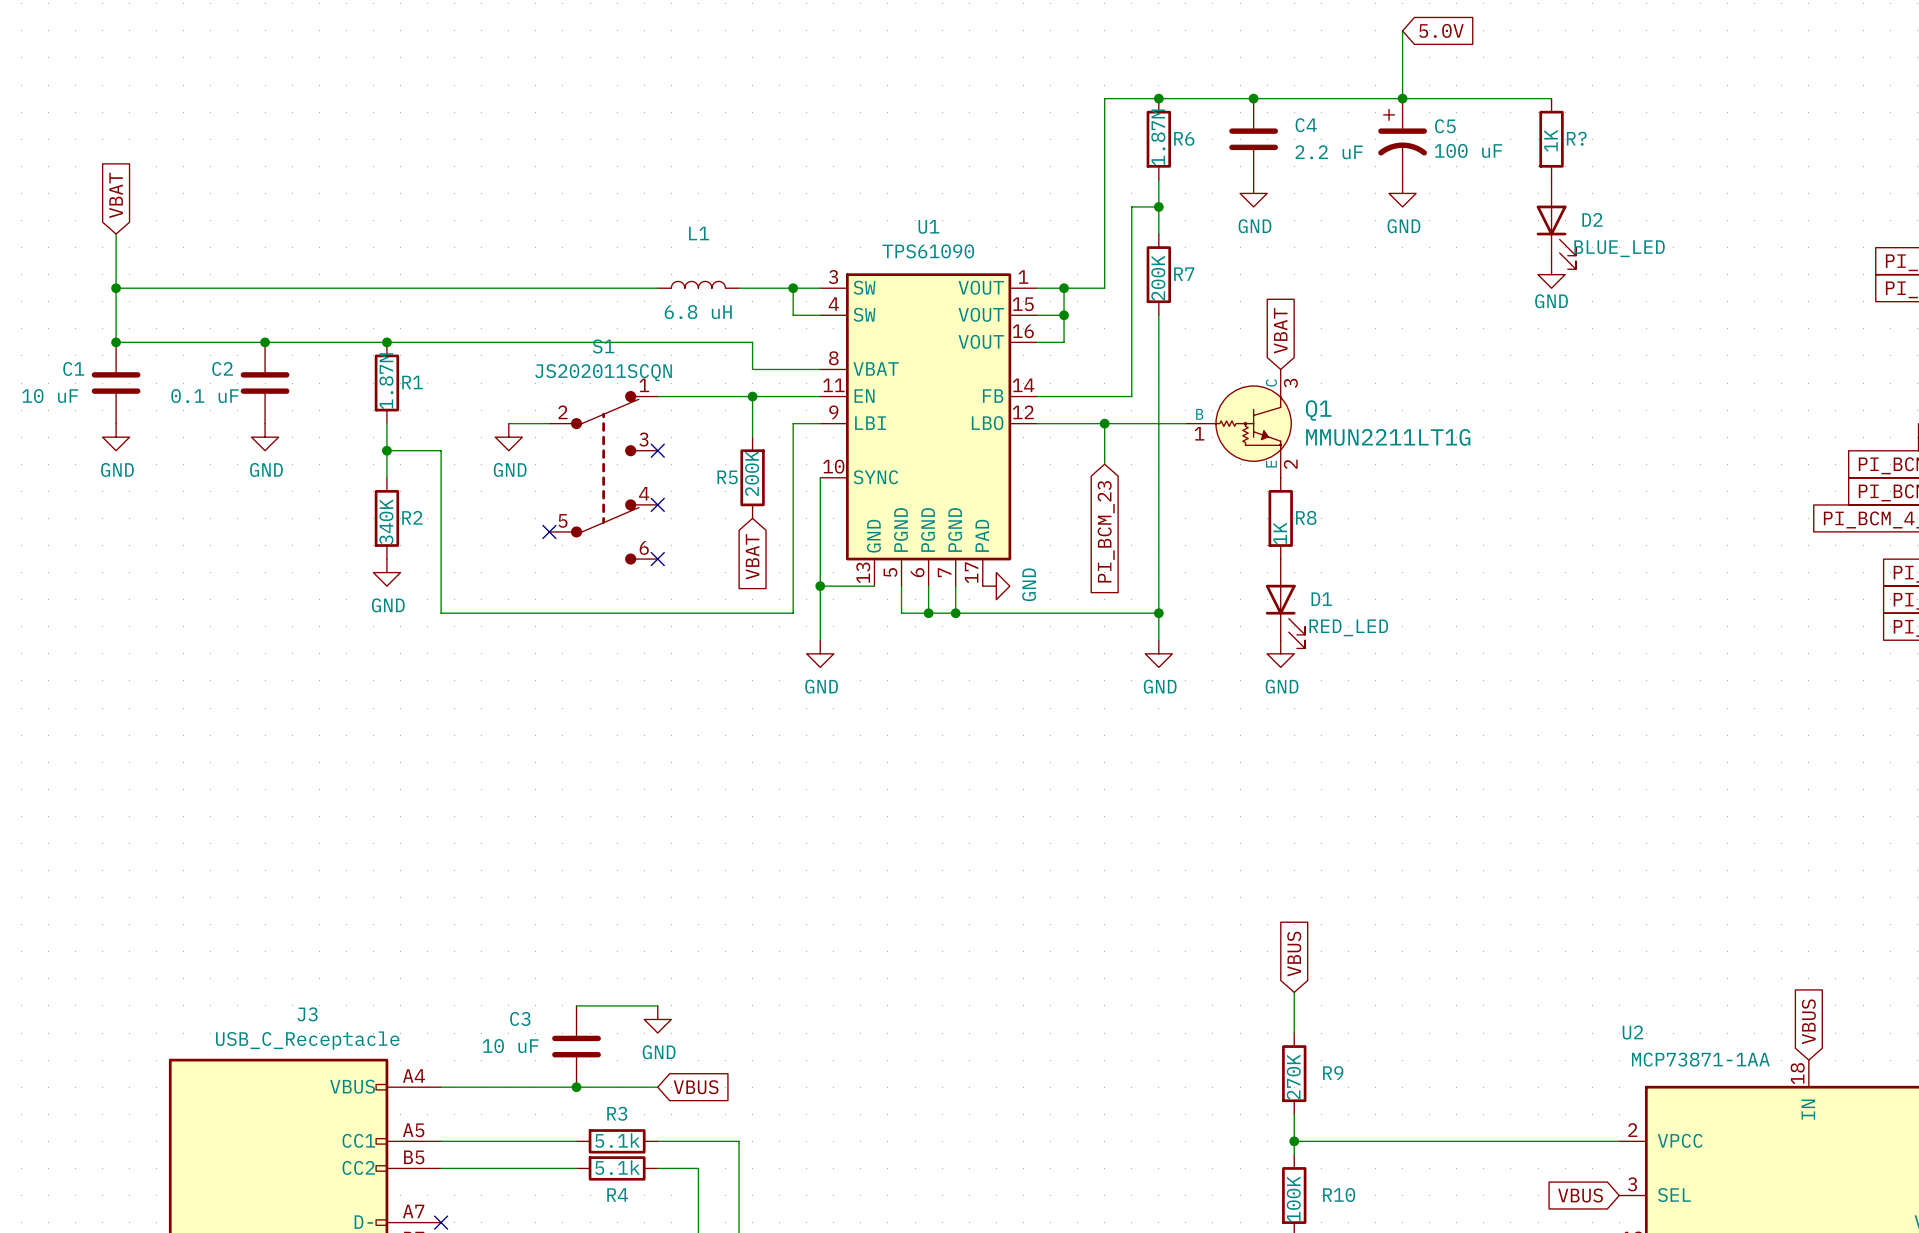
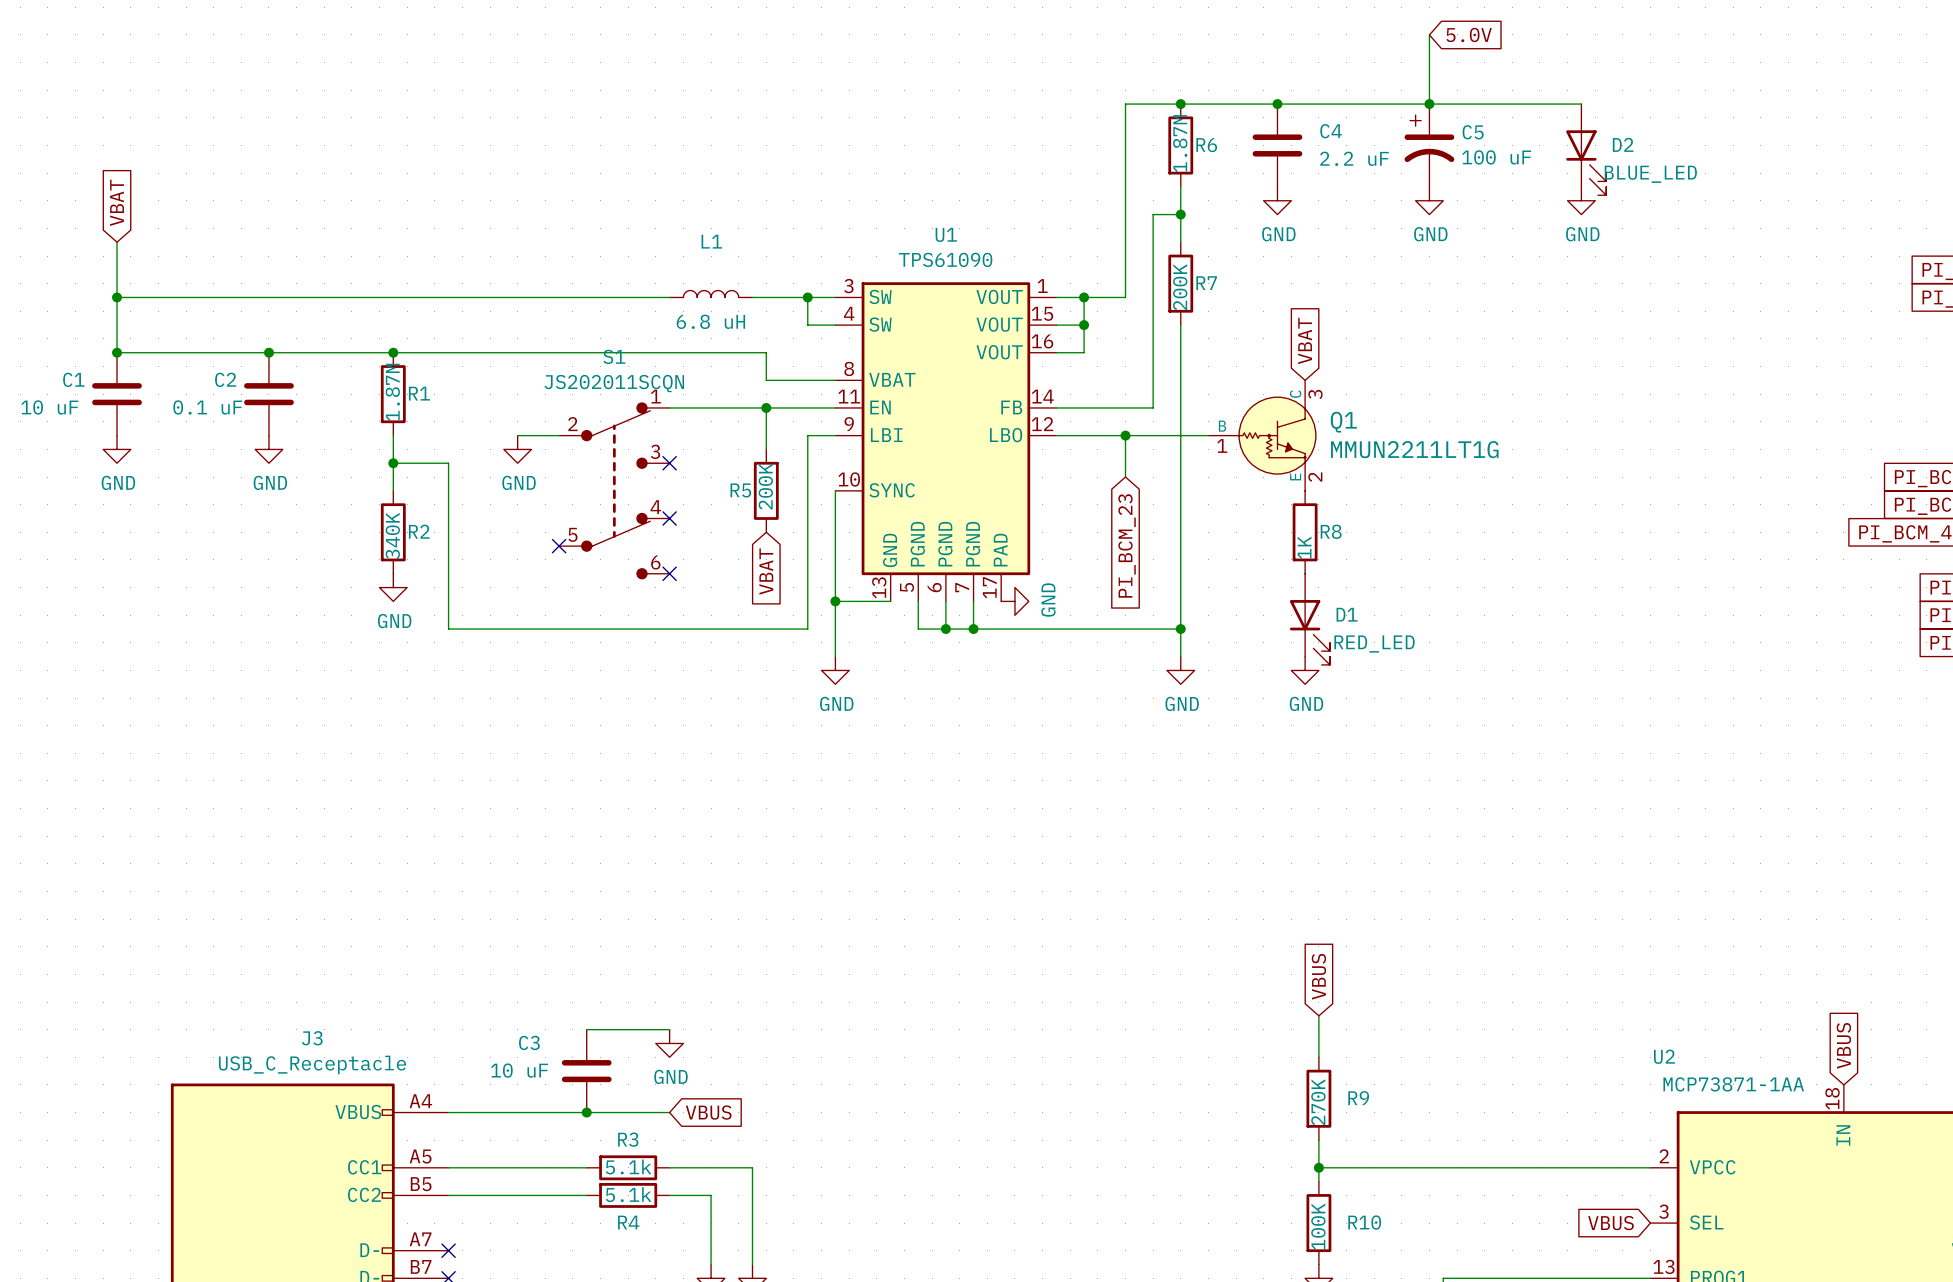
R?: 1K (1551, 139) -> none
D2 position: (1556, 224) -> (1586, 149)
power symbol position: GND (1551, 274) -> GND (1581, 200)
power symbol text position: GND (1551, 301) -> GND (1582, 234)

